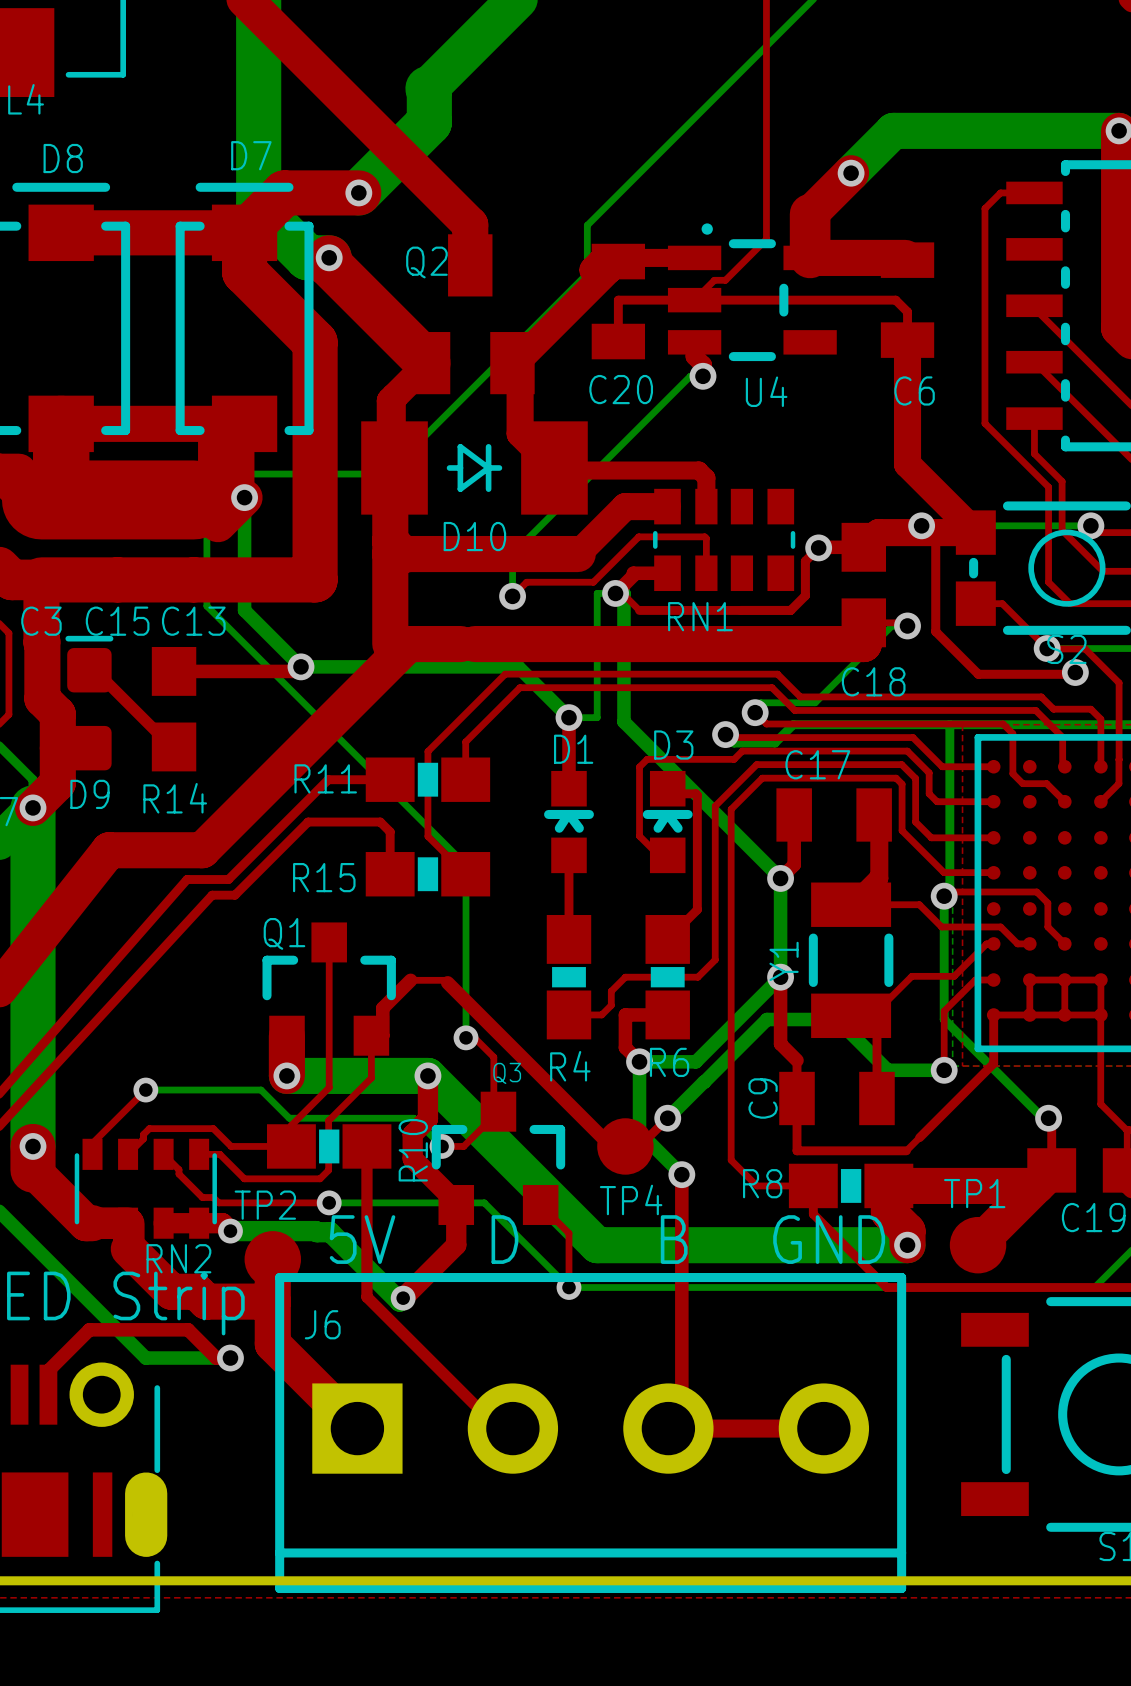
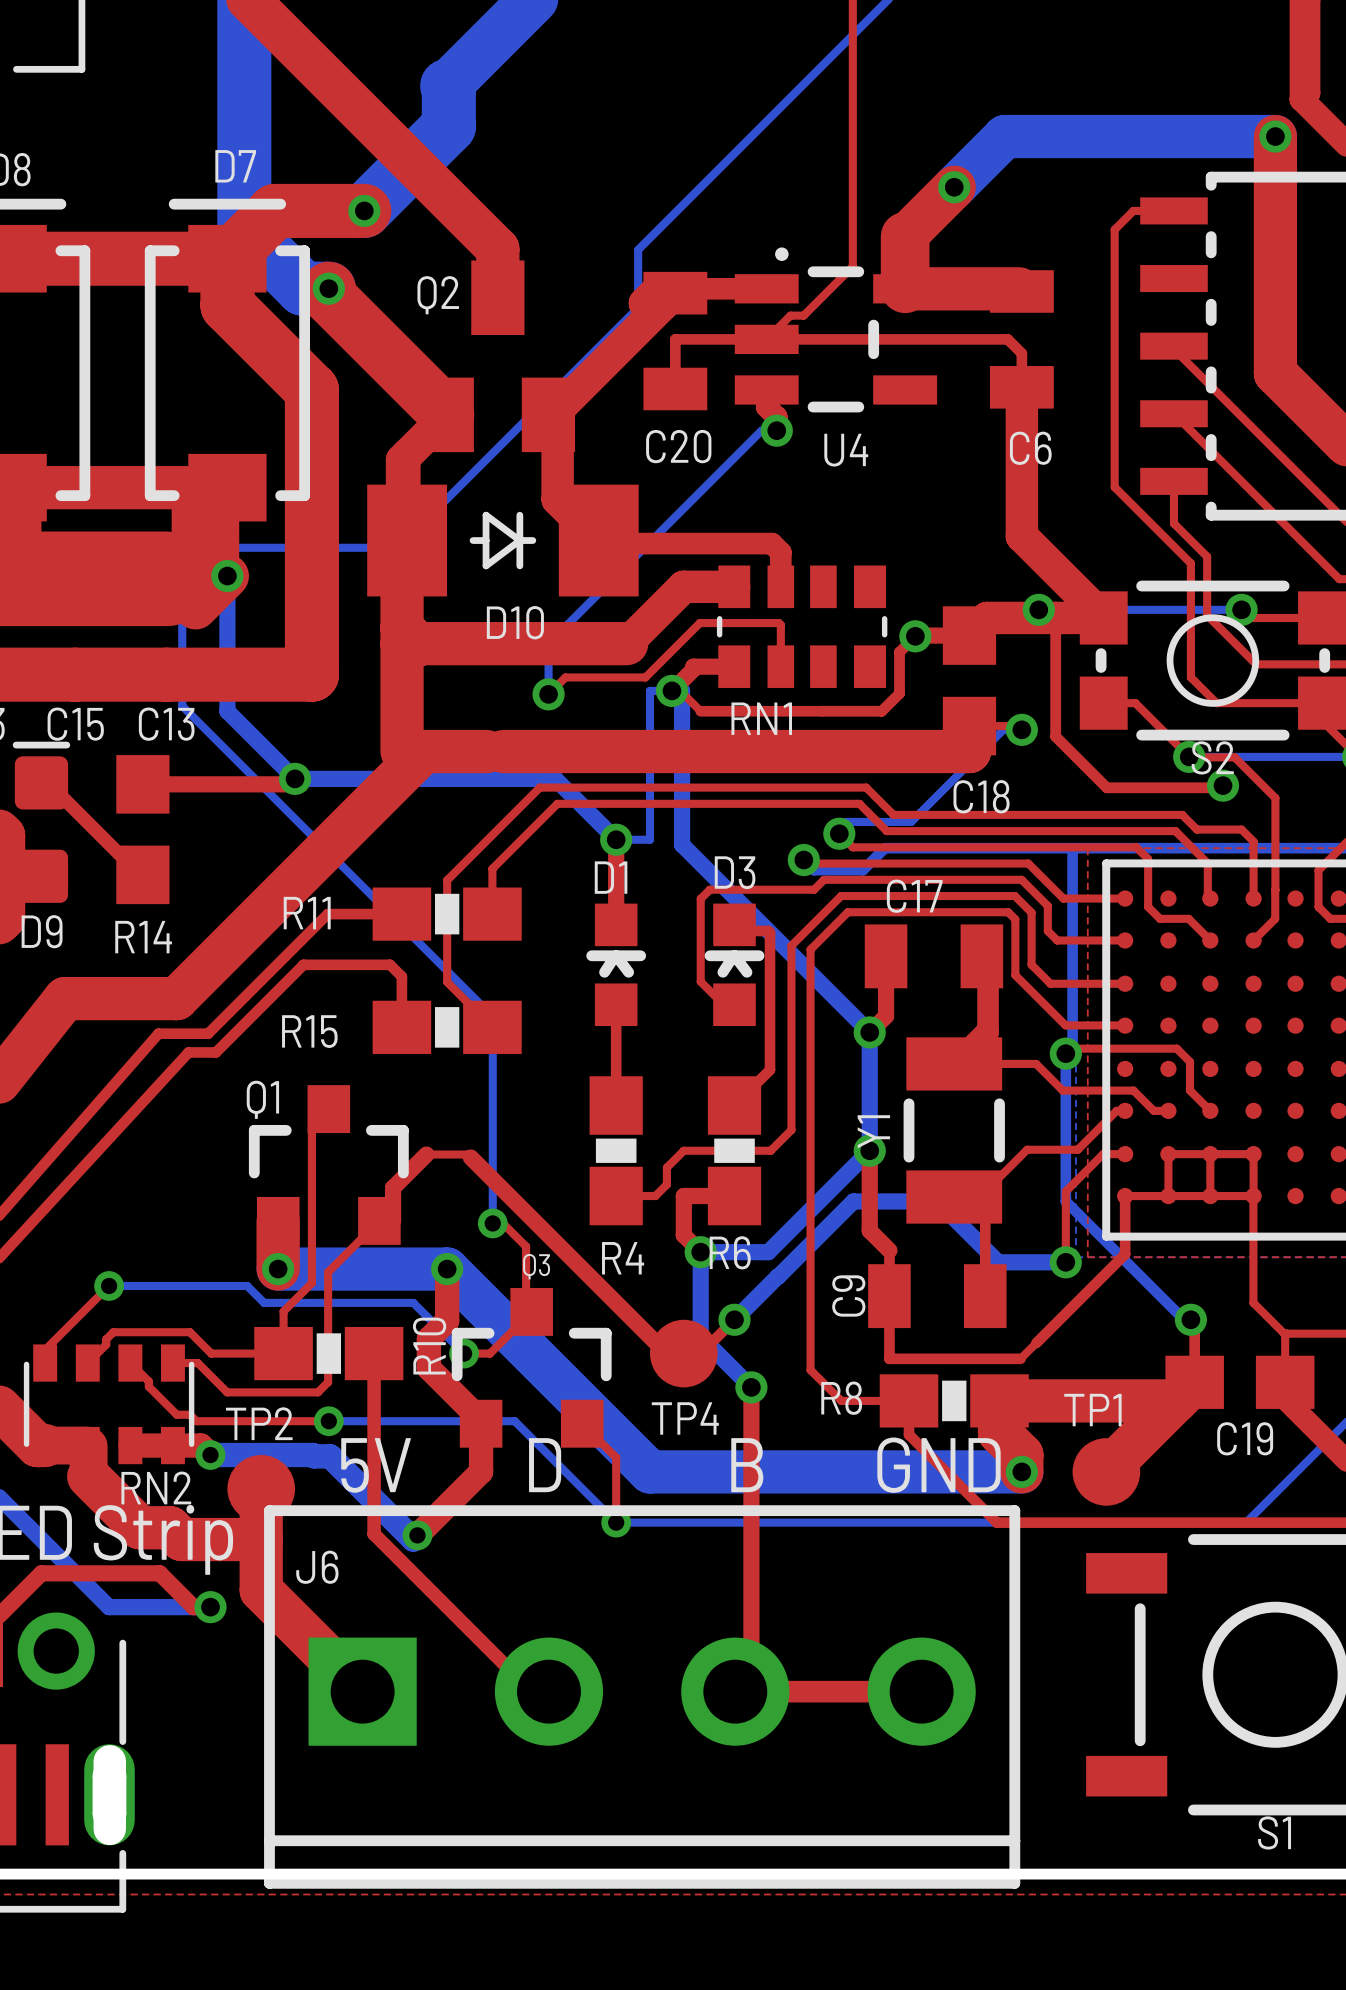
top track: (329, 942) (329, 1087) (291, 1125) -> (328, 1109) (311, 1125) (311, 1283) (283, 1311) (283, 1328)
top track: (371, 1035) (371, 1078) (328, 1120) -> (379, 1220) (328, 1272) (328, 1322)
bottom track: (275, 1104) (289, 1118) (413, 1118) -> (264, 1302) (413, 1302) (430, 1319)

